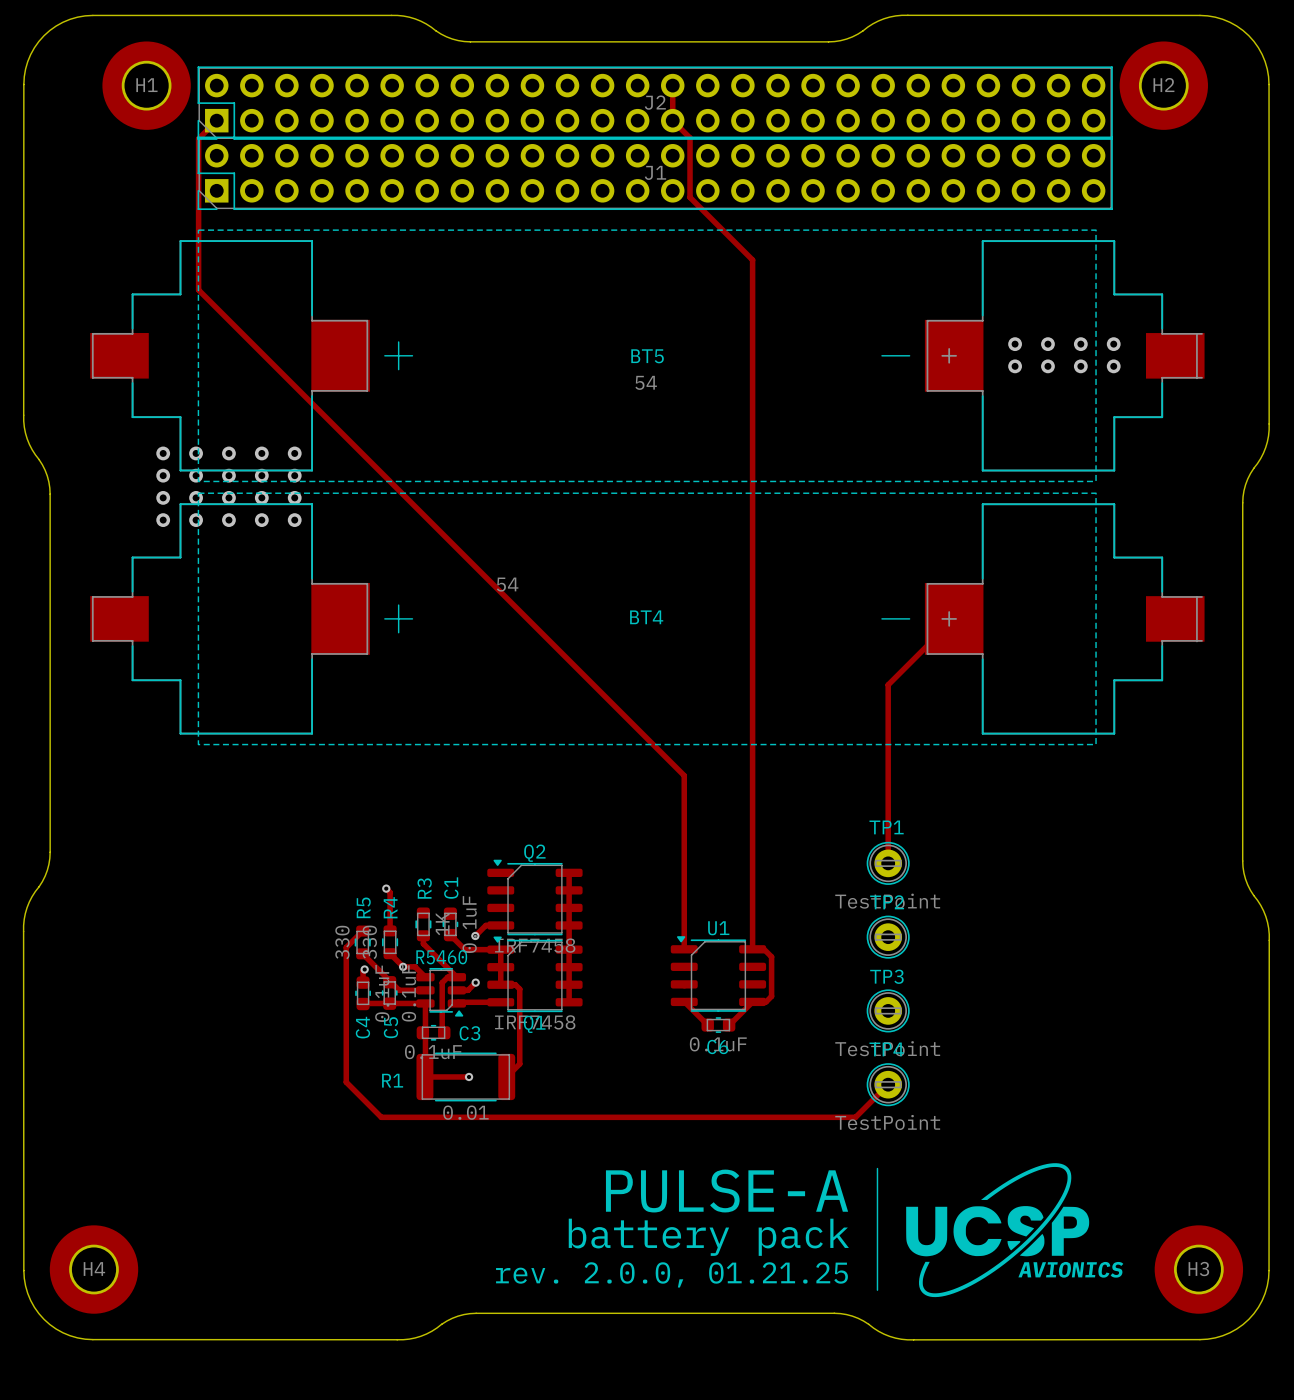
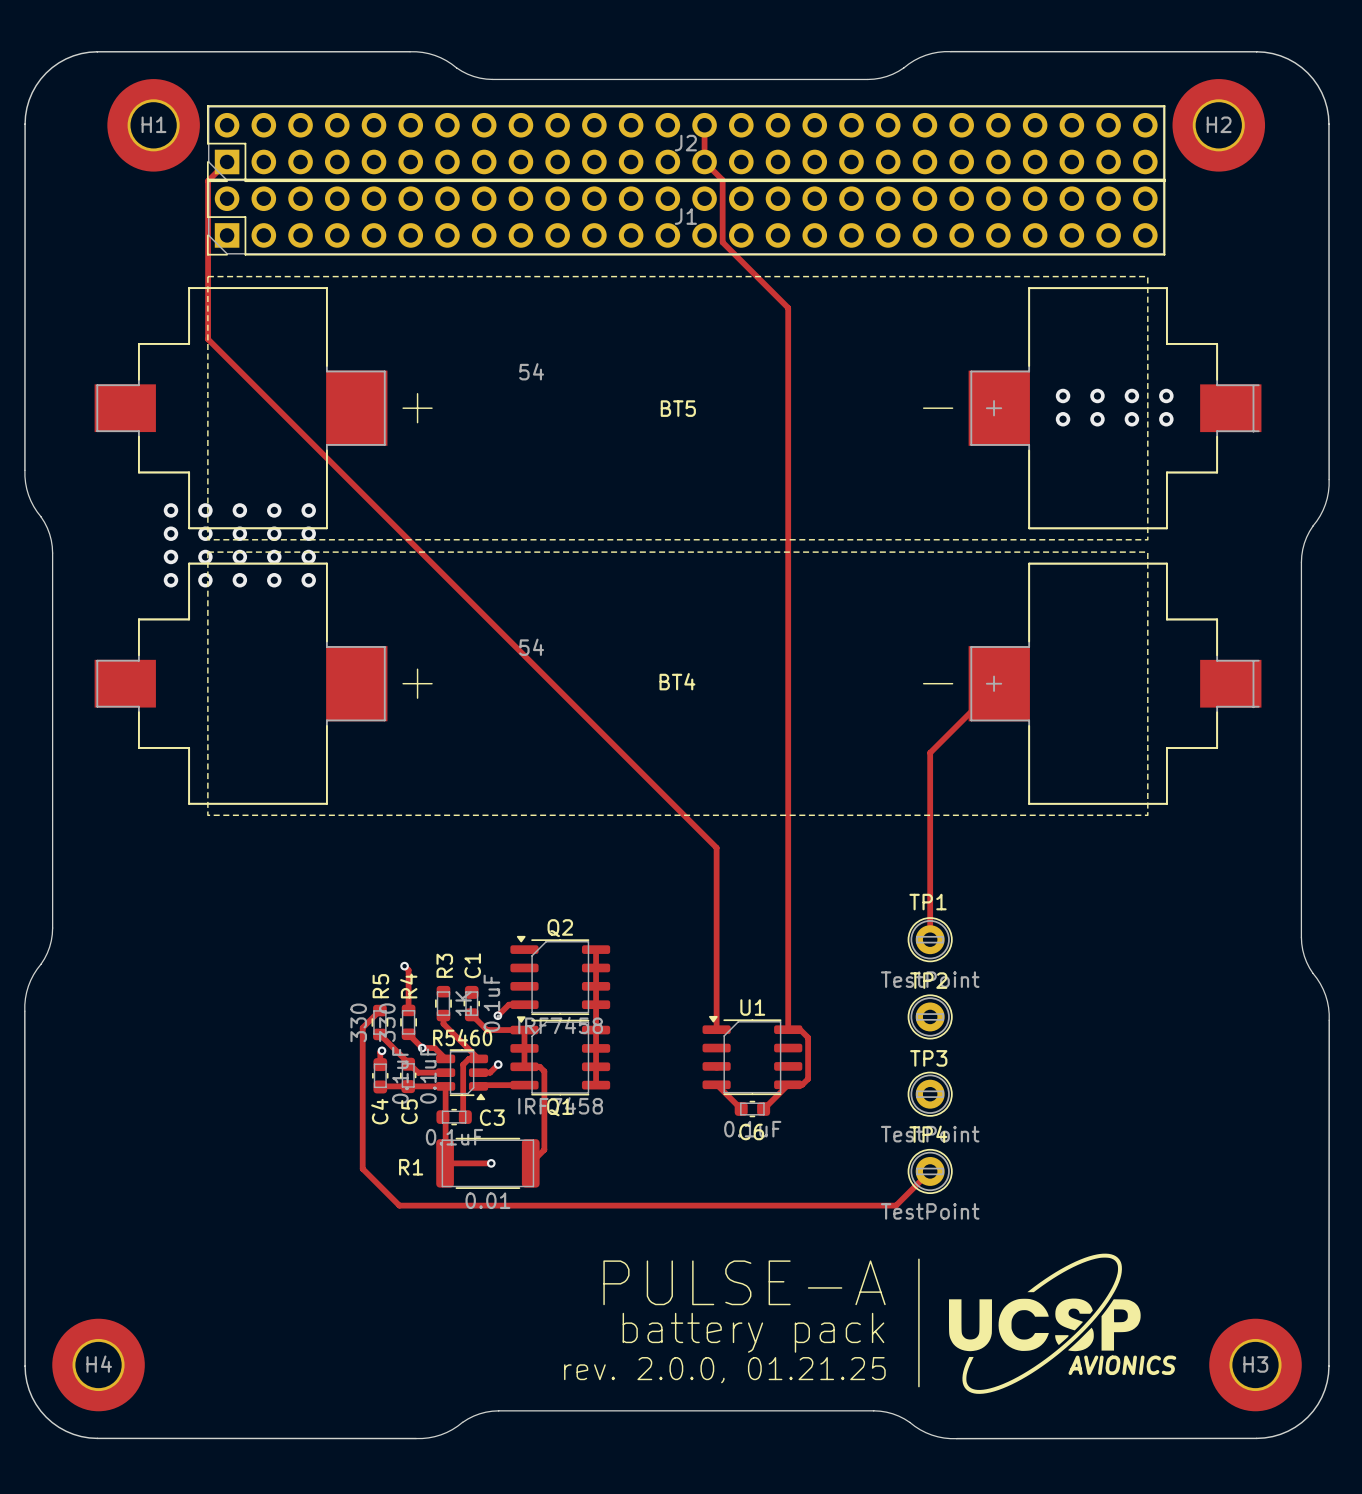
BT5 value position: 54 (646, 382) -> 54 (531, 371)

